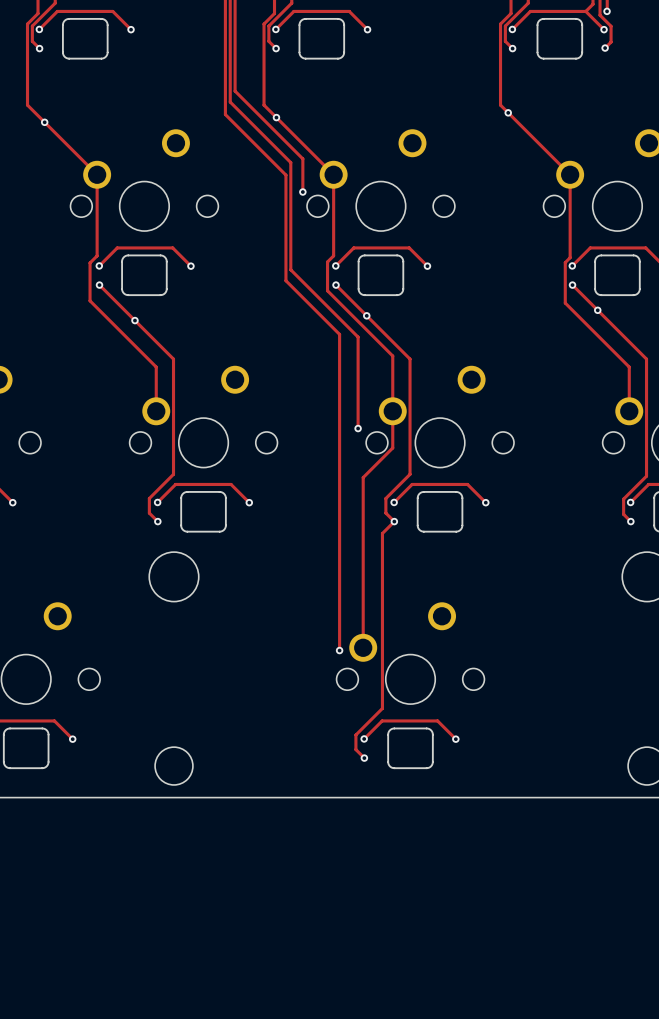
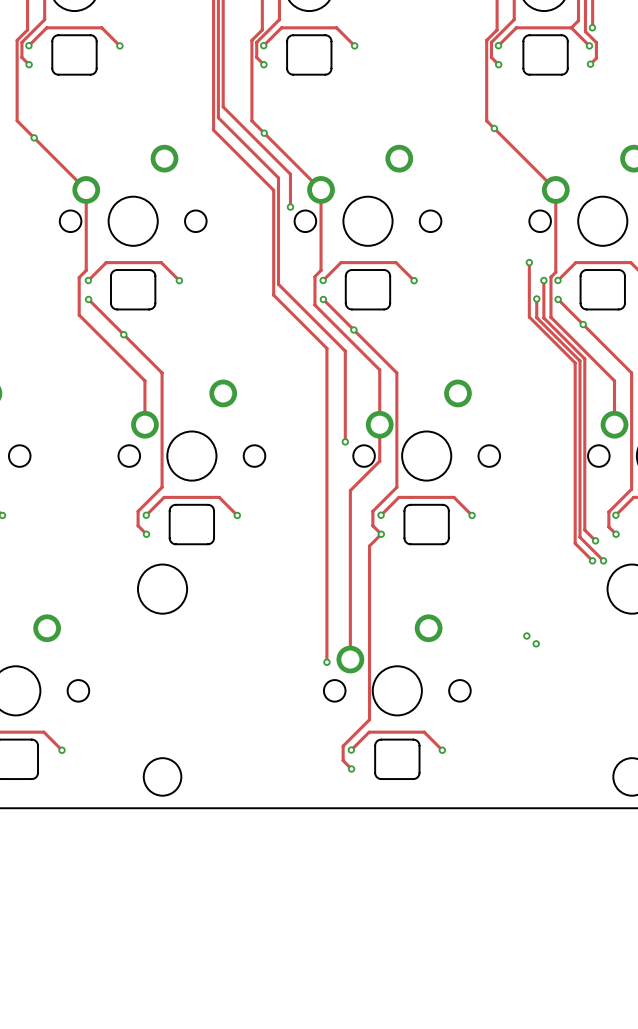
track: none -> (529, 262) (529, 317) (575, 362) (575, 543) (592, 560)
via: none -> (529, 262)
track: none -> (543, 280) (543, 317) (584, 358) (584, 530) (595, 540)
via: none -> (543, 280)
track: none -> (536, 298) (536, 317) (579, 360) (579, 537) (603, 560)
via: none -> (536, 298)
via: none -> (595, 540)
via: none -> (592, 560)
via: none -> (603, 560)
via: none -> (526, 635)
via: none -> (536, 643)

